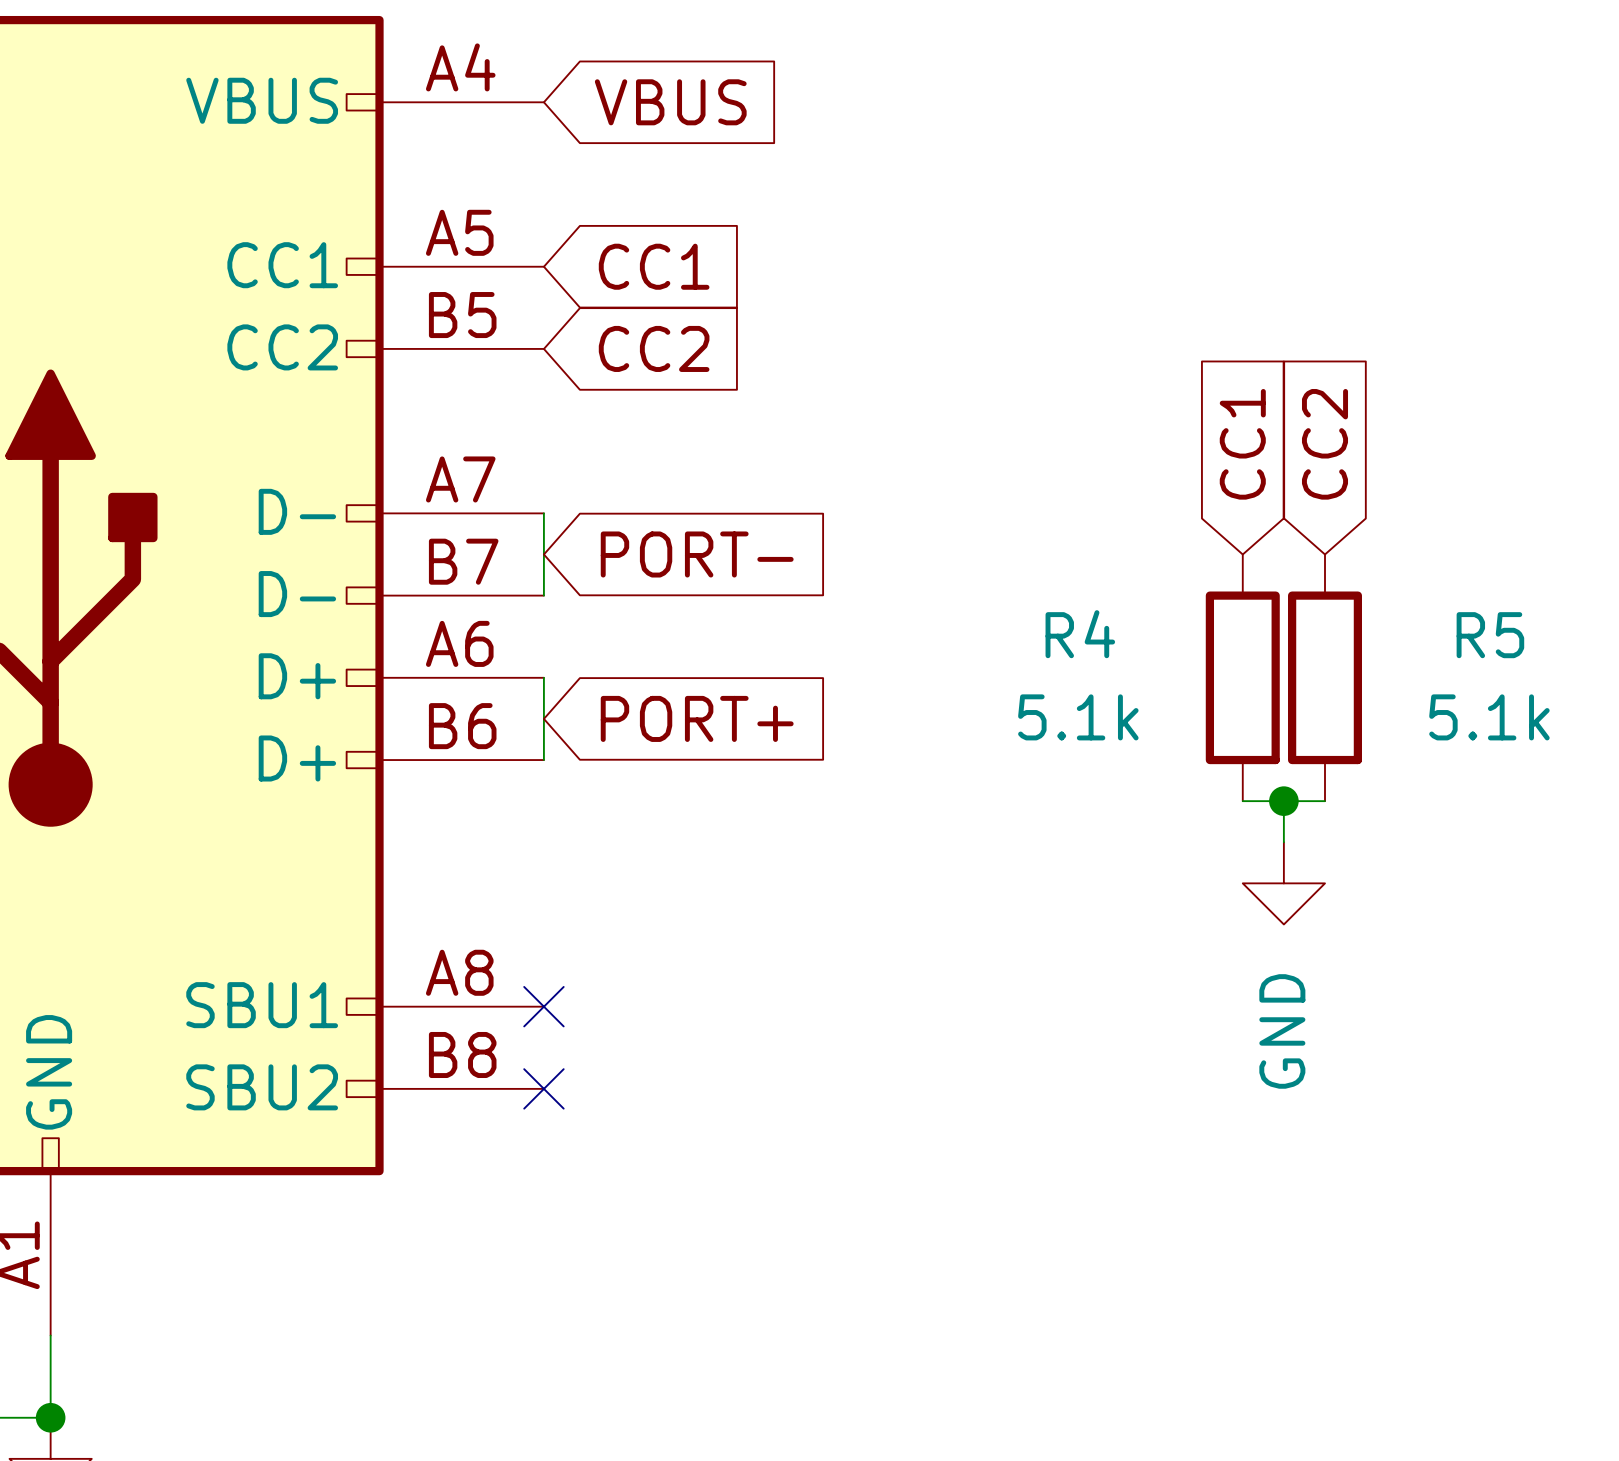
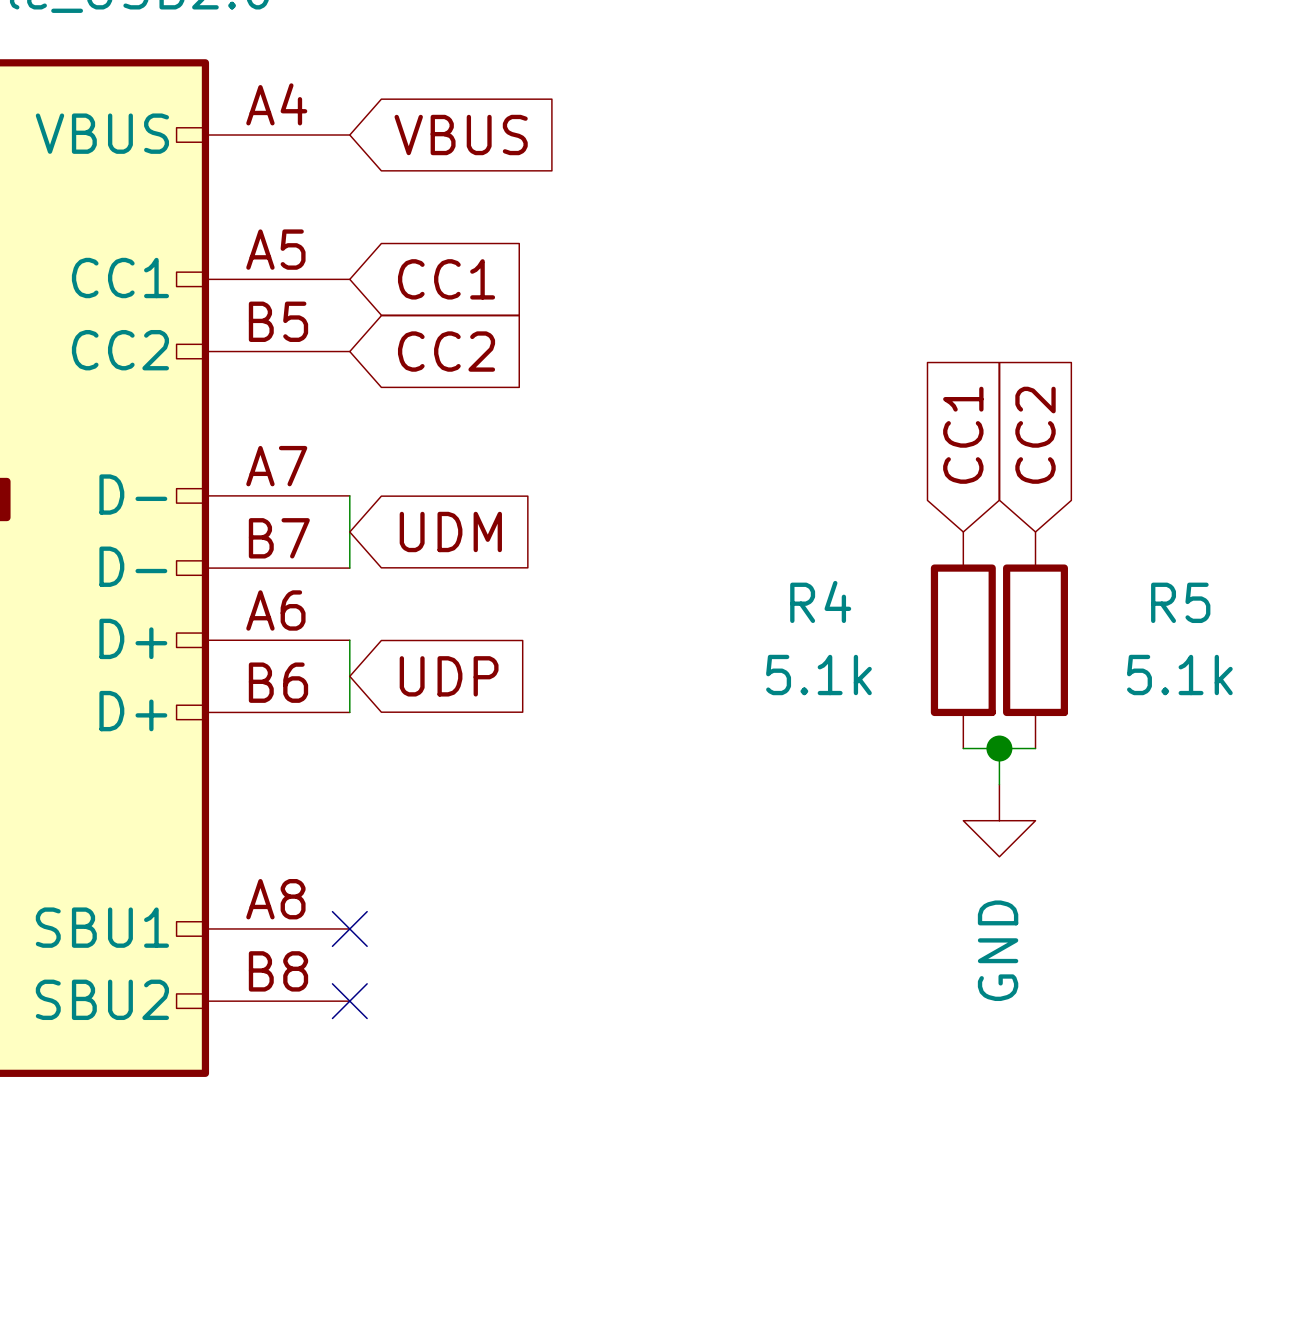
global label: PORT- (697, 554) -> UDM (450, 531)
global label: PORT+ (697, 718) -> UDP (449, 676)

